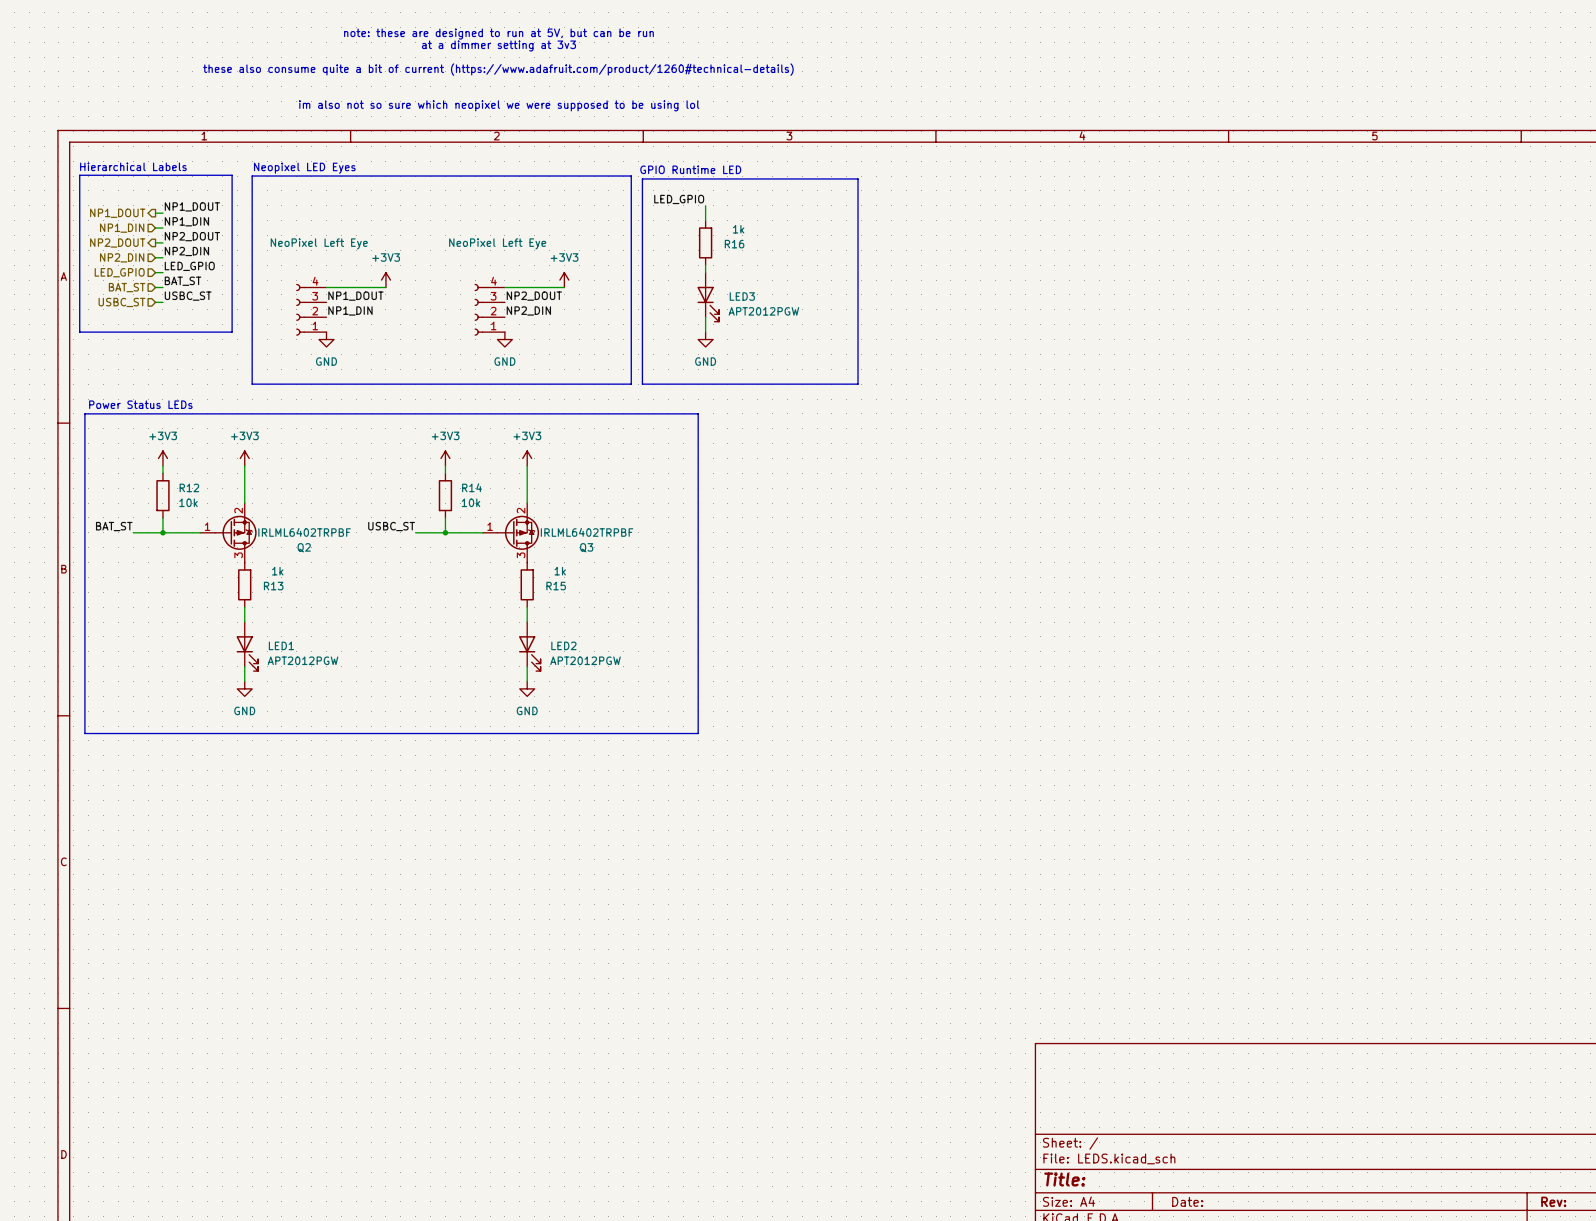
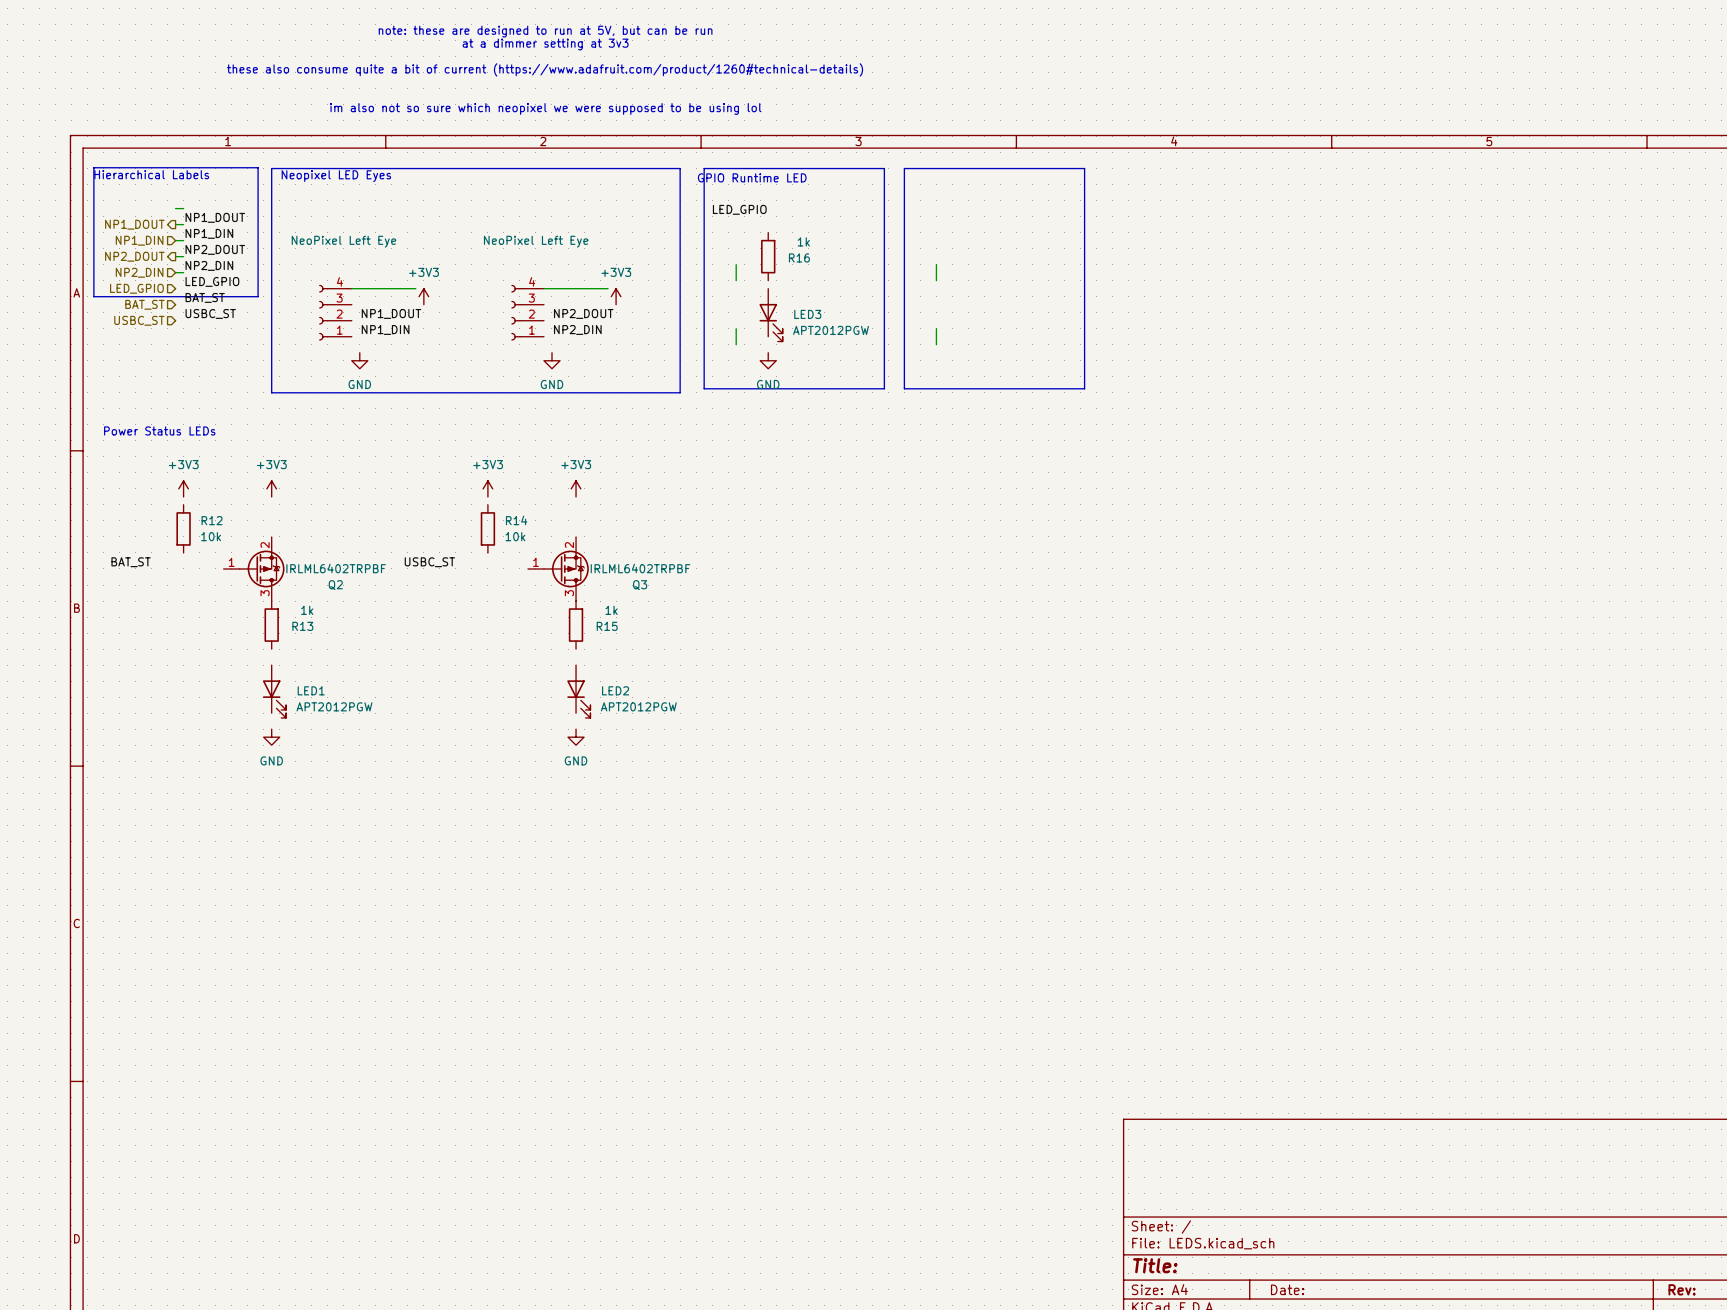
line: none -> (904, 168) (1084, 168) (1084, 388) (904, 388) (904, 168)
line: (79, 175) (232, 175) -> (93, 183) (93, 167) (258, 167) (258, 183)
line: (252, 176) (631, 176) (631, 384) (252, 384) (252, 176) -> (271, 168) (680, 168) (680, 392) (271, 392) (271, 168)
line: (642, 178) (858, 178) (858, 384) (642, 384) (642, 178) -> (704, 168) (704, 388) (884, 388) (884, 168) (704, 168)
wire: (705, 205) (705, 220) -> (736, 264) (736, 280)
wire: none -> (936, 264) (936, 280)
wire: (705, 265) (705, 272) -> none
wire: (155, 272) (162, 272) -> (175, 208) (183, 208)
line: (79, 280) (79, 332) (232, 332) (232, 280) -> (93, 296) (258, 296)
wire: (155, 287) (162, 287) -> none
wire: (326, 287) (385, 287) -> (351, 288) (415, 288)
wire: (504, 287) (564, 287) -> (543, 288) (608, 288)
wire: (155, 302) (162, 302) -> none
part position: (311, 309) -> (335, 312)
part position: (489, 309) -> (527, 312)
wire: none -> (936, 328) (936, 344)
wire: (705, 317) (705, 332) -> (736, 328) (736, 344)
line: (84, 413) (698, 413) (698, 733) (84, 733) (84, 413) -> none
wire: (162, 465) (162, 473) -> none
wire: (244, 465) (244, 503) -> none
wire: (445, 465) (445, 473) -> none
wire: (527, 465) (527, 503) -> none
wire: (162, 517) (162, 532) -> none
wire: (445, 517) (445, 532) -> none
wire: (133, 532) (200, 532) -> none
junction: (162, 532) -> none
wire: (415, 532) (482, 532) -> none
junction: (445, 532) -> none
wire: (244, 607) (244, 622) -> none
wire: (527, 607) (527, 622) -> none
wire: (244, 666) (244, 681) -> none
wire: (527, 666) (527, 681) -> none

